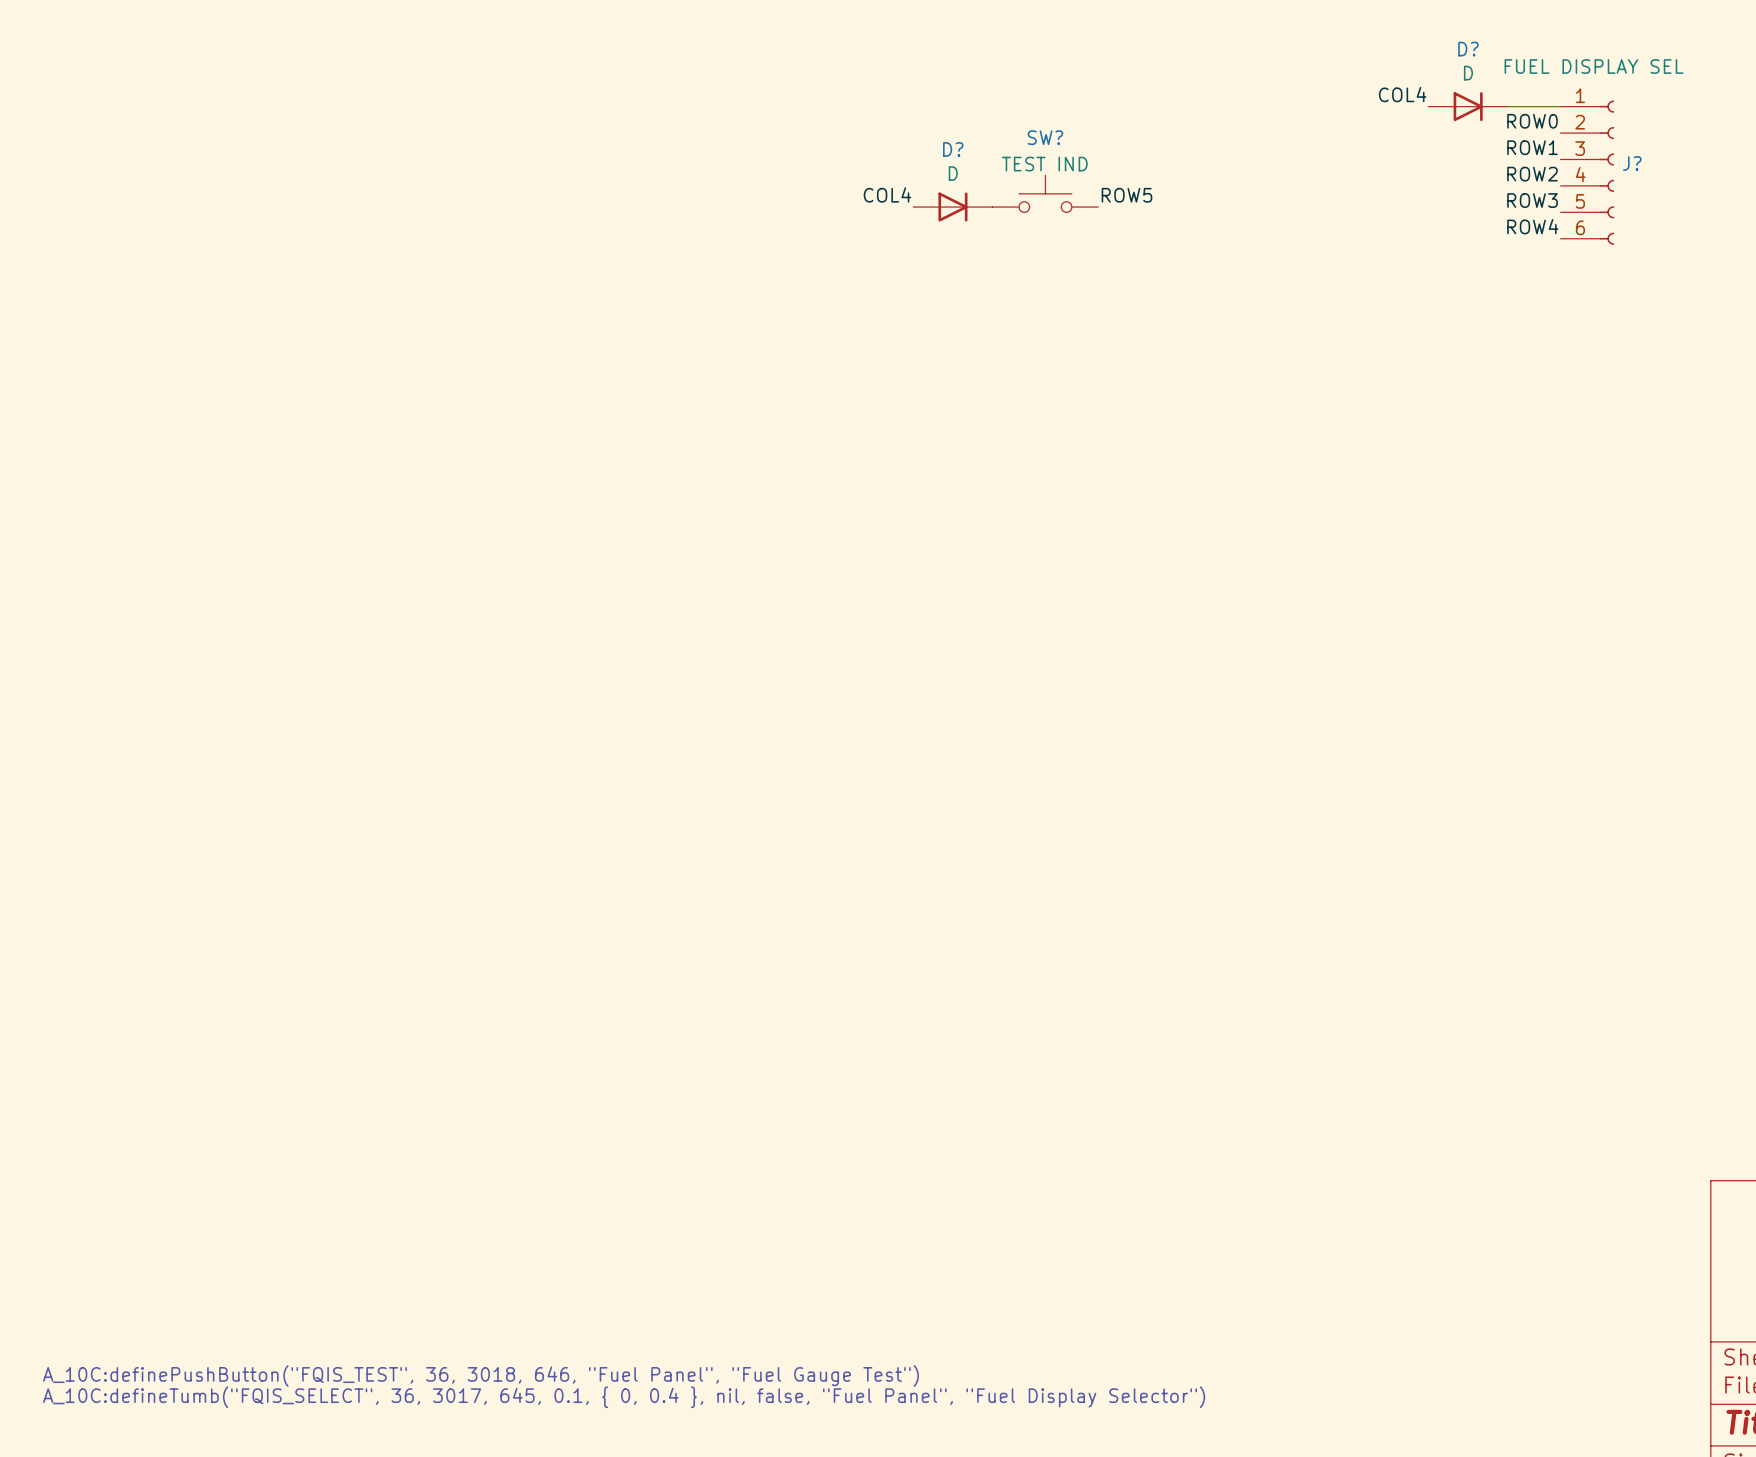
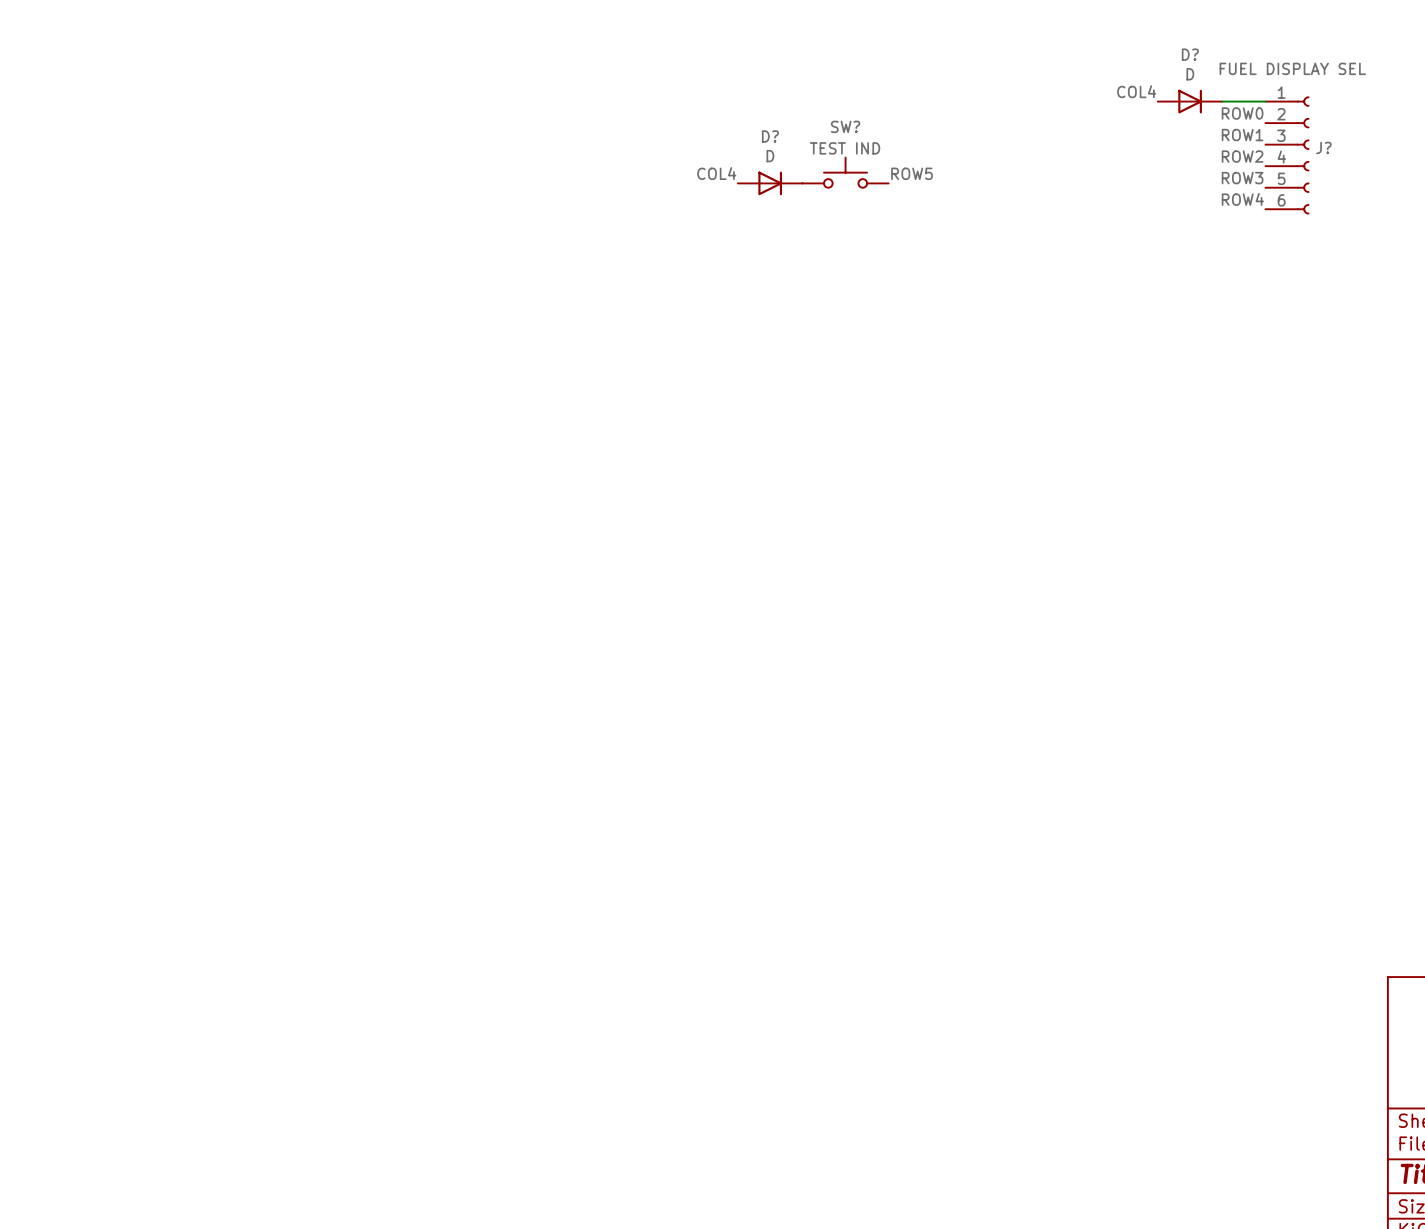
text: A_10C:definePushButton("FQIS_TEST", 36, 3018, 646, "Fuel Panel", "Fuel Gauge Test") (480, 1375) -> none
text: A_10C:defineTumb("FQIS_SELECT", 36, 3017, 645, 0.1, { 0, 0.4 }, nil, false, "Fuel Panel", "Fuel Display Selector") (624, 1397) -> none

